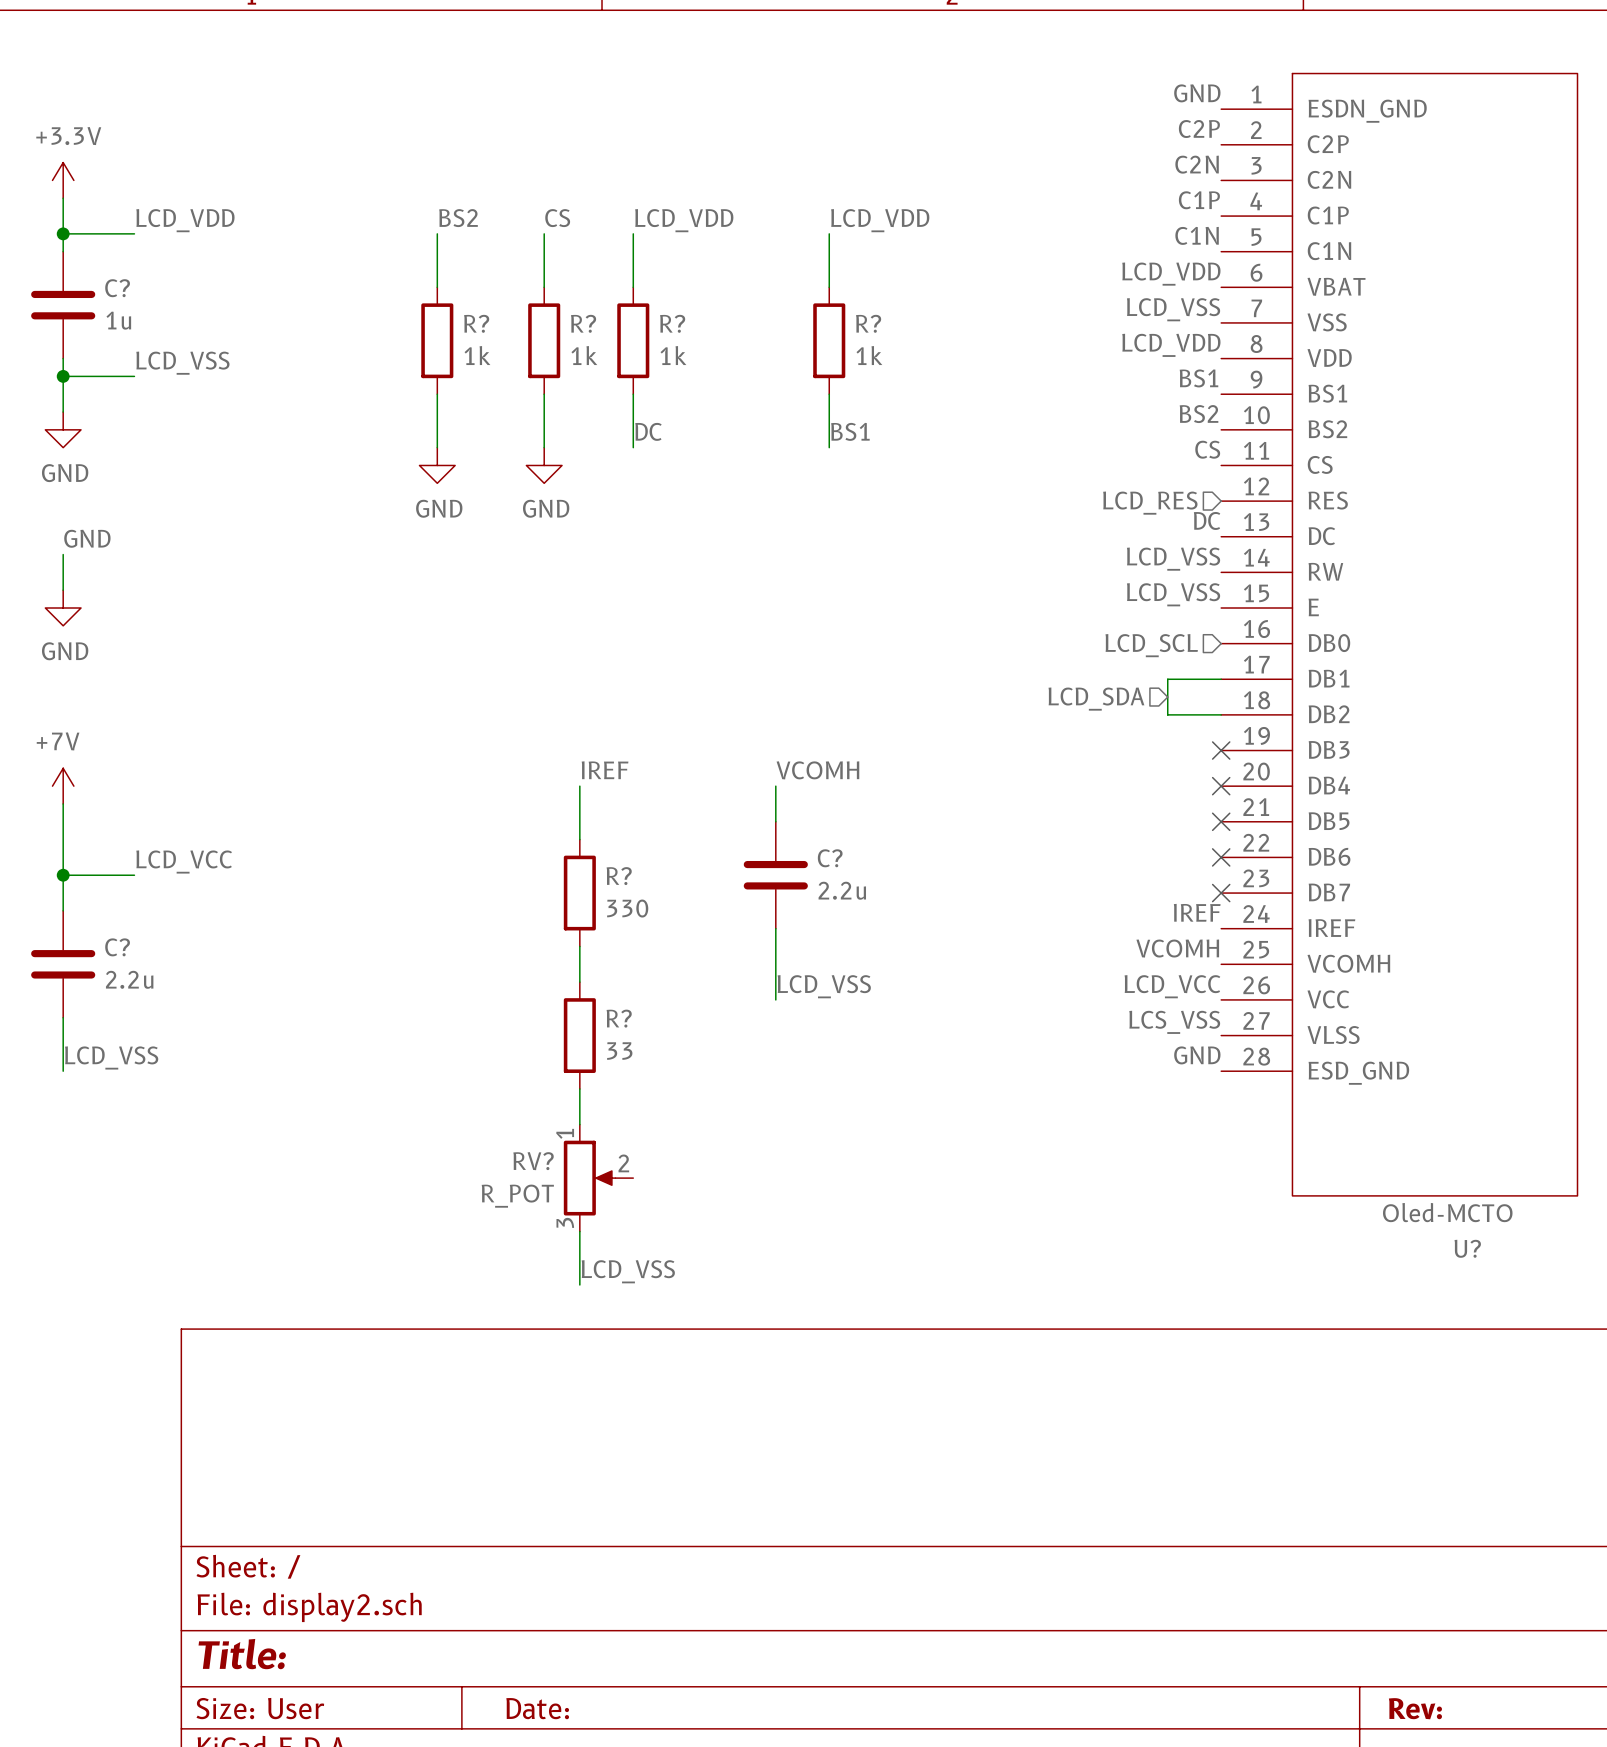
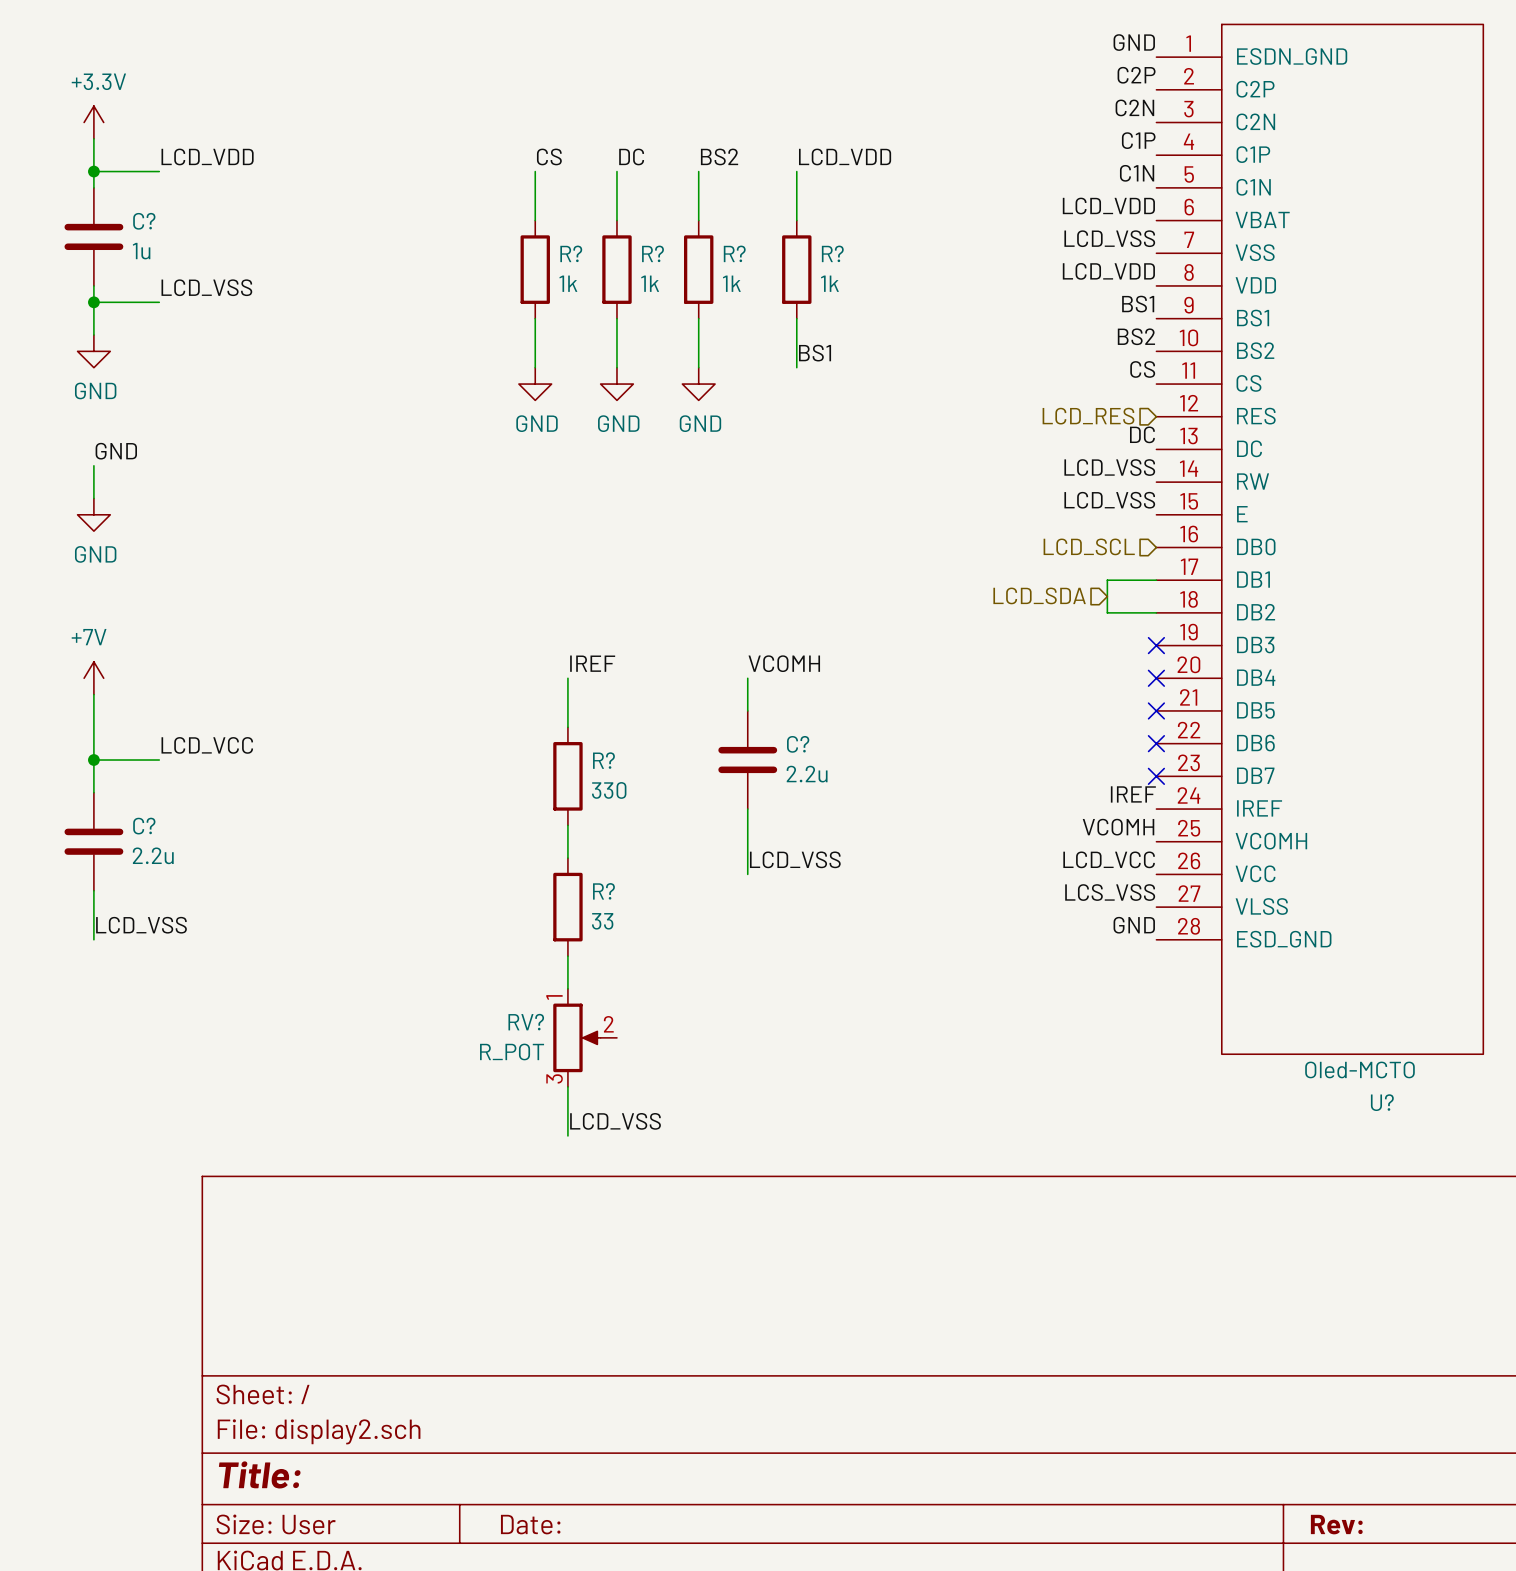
label position: BS2 (458, 218) -> BS2 (719, 156)
label: LCD_VDD (684, 220) -> DC (631, 156)
wire: (437, 233) (437, 287) -> (698, 171) (698, 220)
R? position: (437, 340) -> (698, 269)
wire: (437, 394) (437, 447) -> (698, 318) (698, 367)
label: DC (648, 431) -> none
power symbol: GND (437, 465) -> none
power symbol: none -> GND (616, 384)
power symbol: none -> GND (698, 384)

